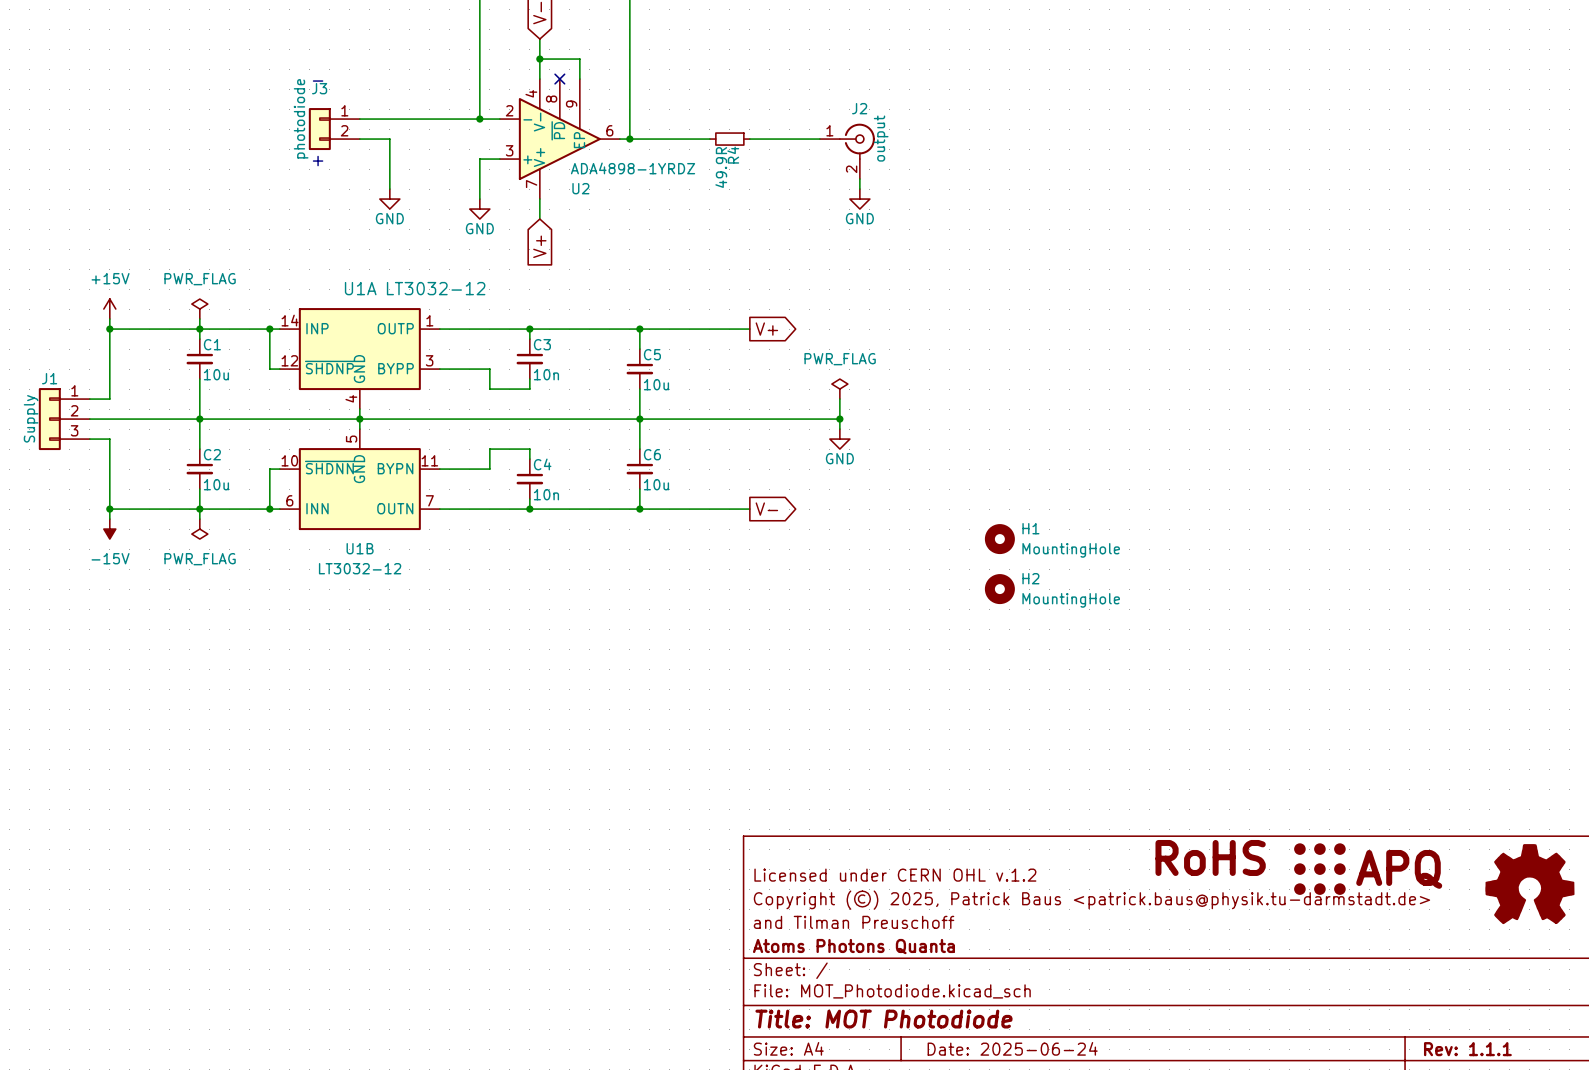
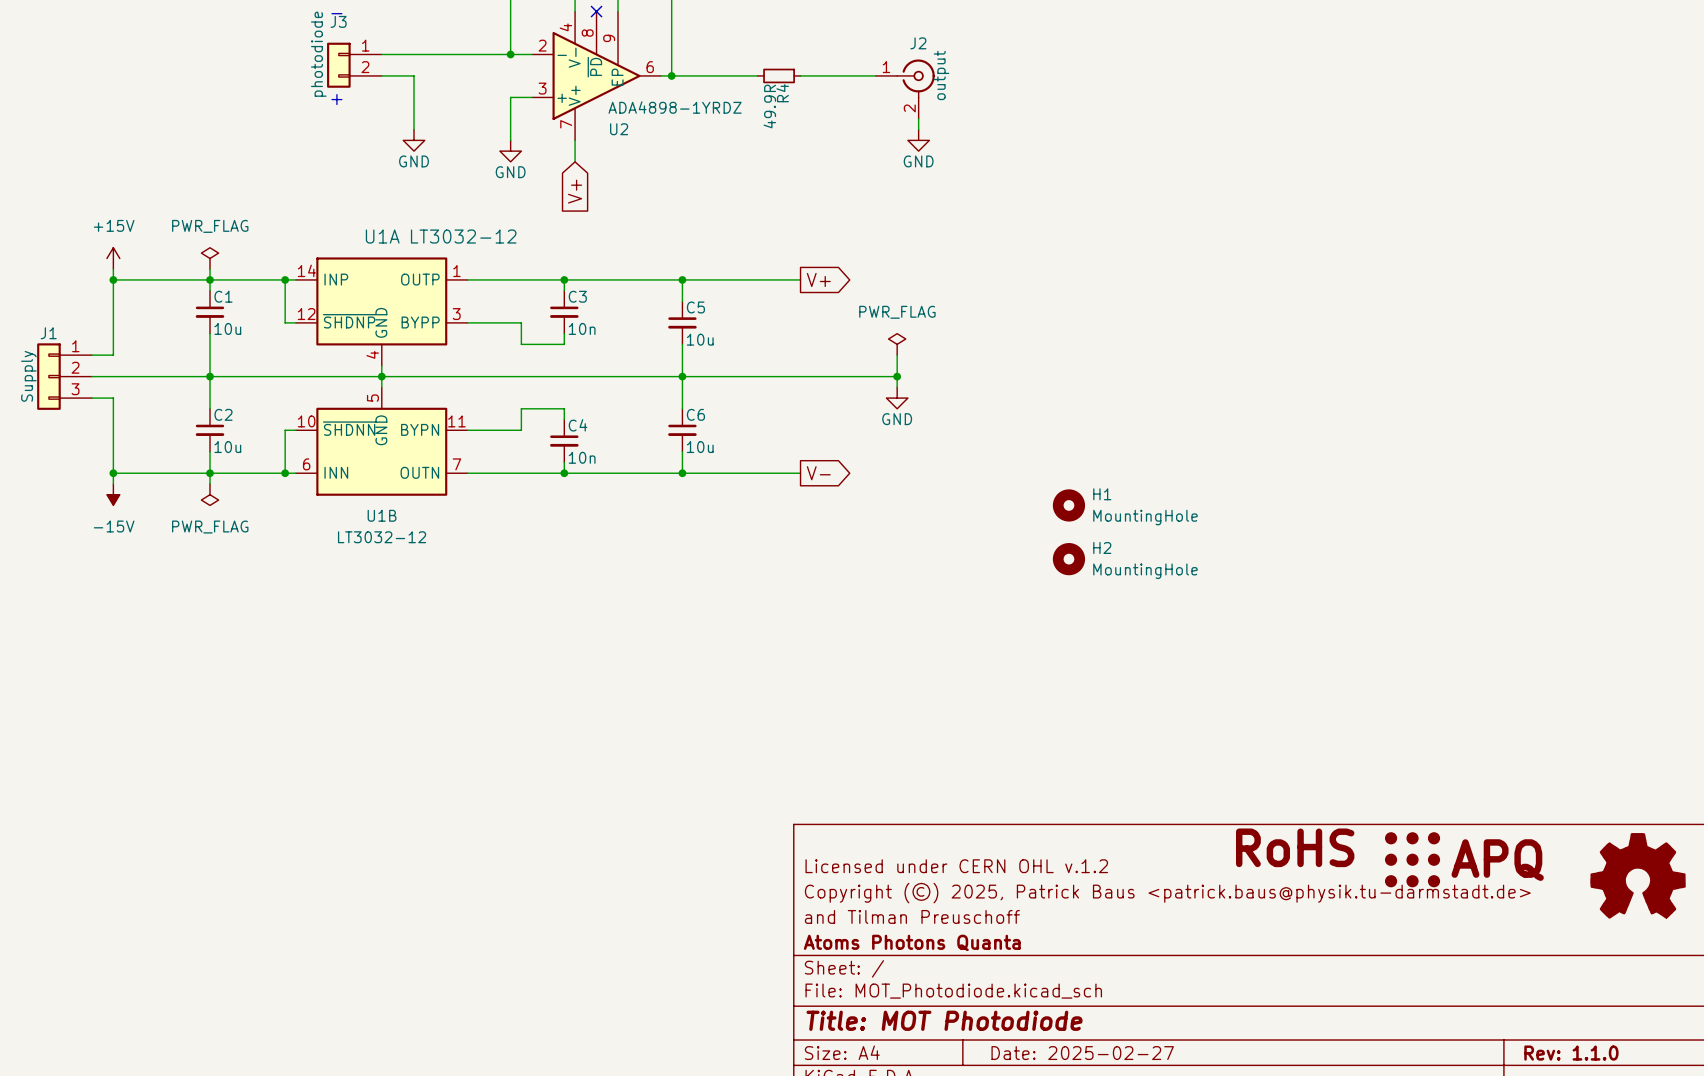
title block: Date: 2025-06-24 (1012, 1048) -> Date: 2025-02-27 (1082, 1053)
title block: Rev: 1.1.1 (1467, 1049) -> Rev: 1.1.0 (1571, 1053)

